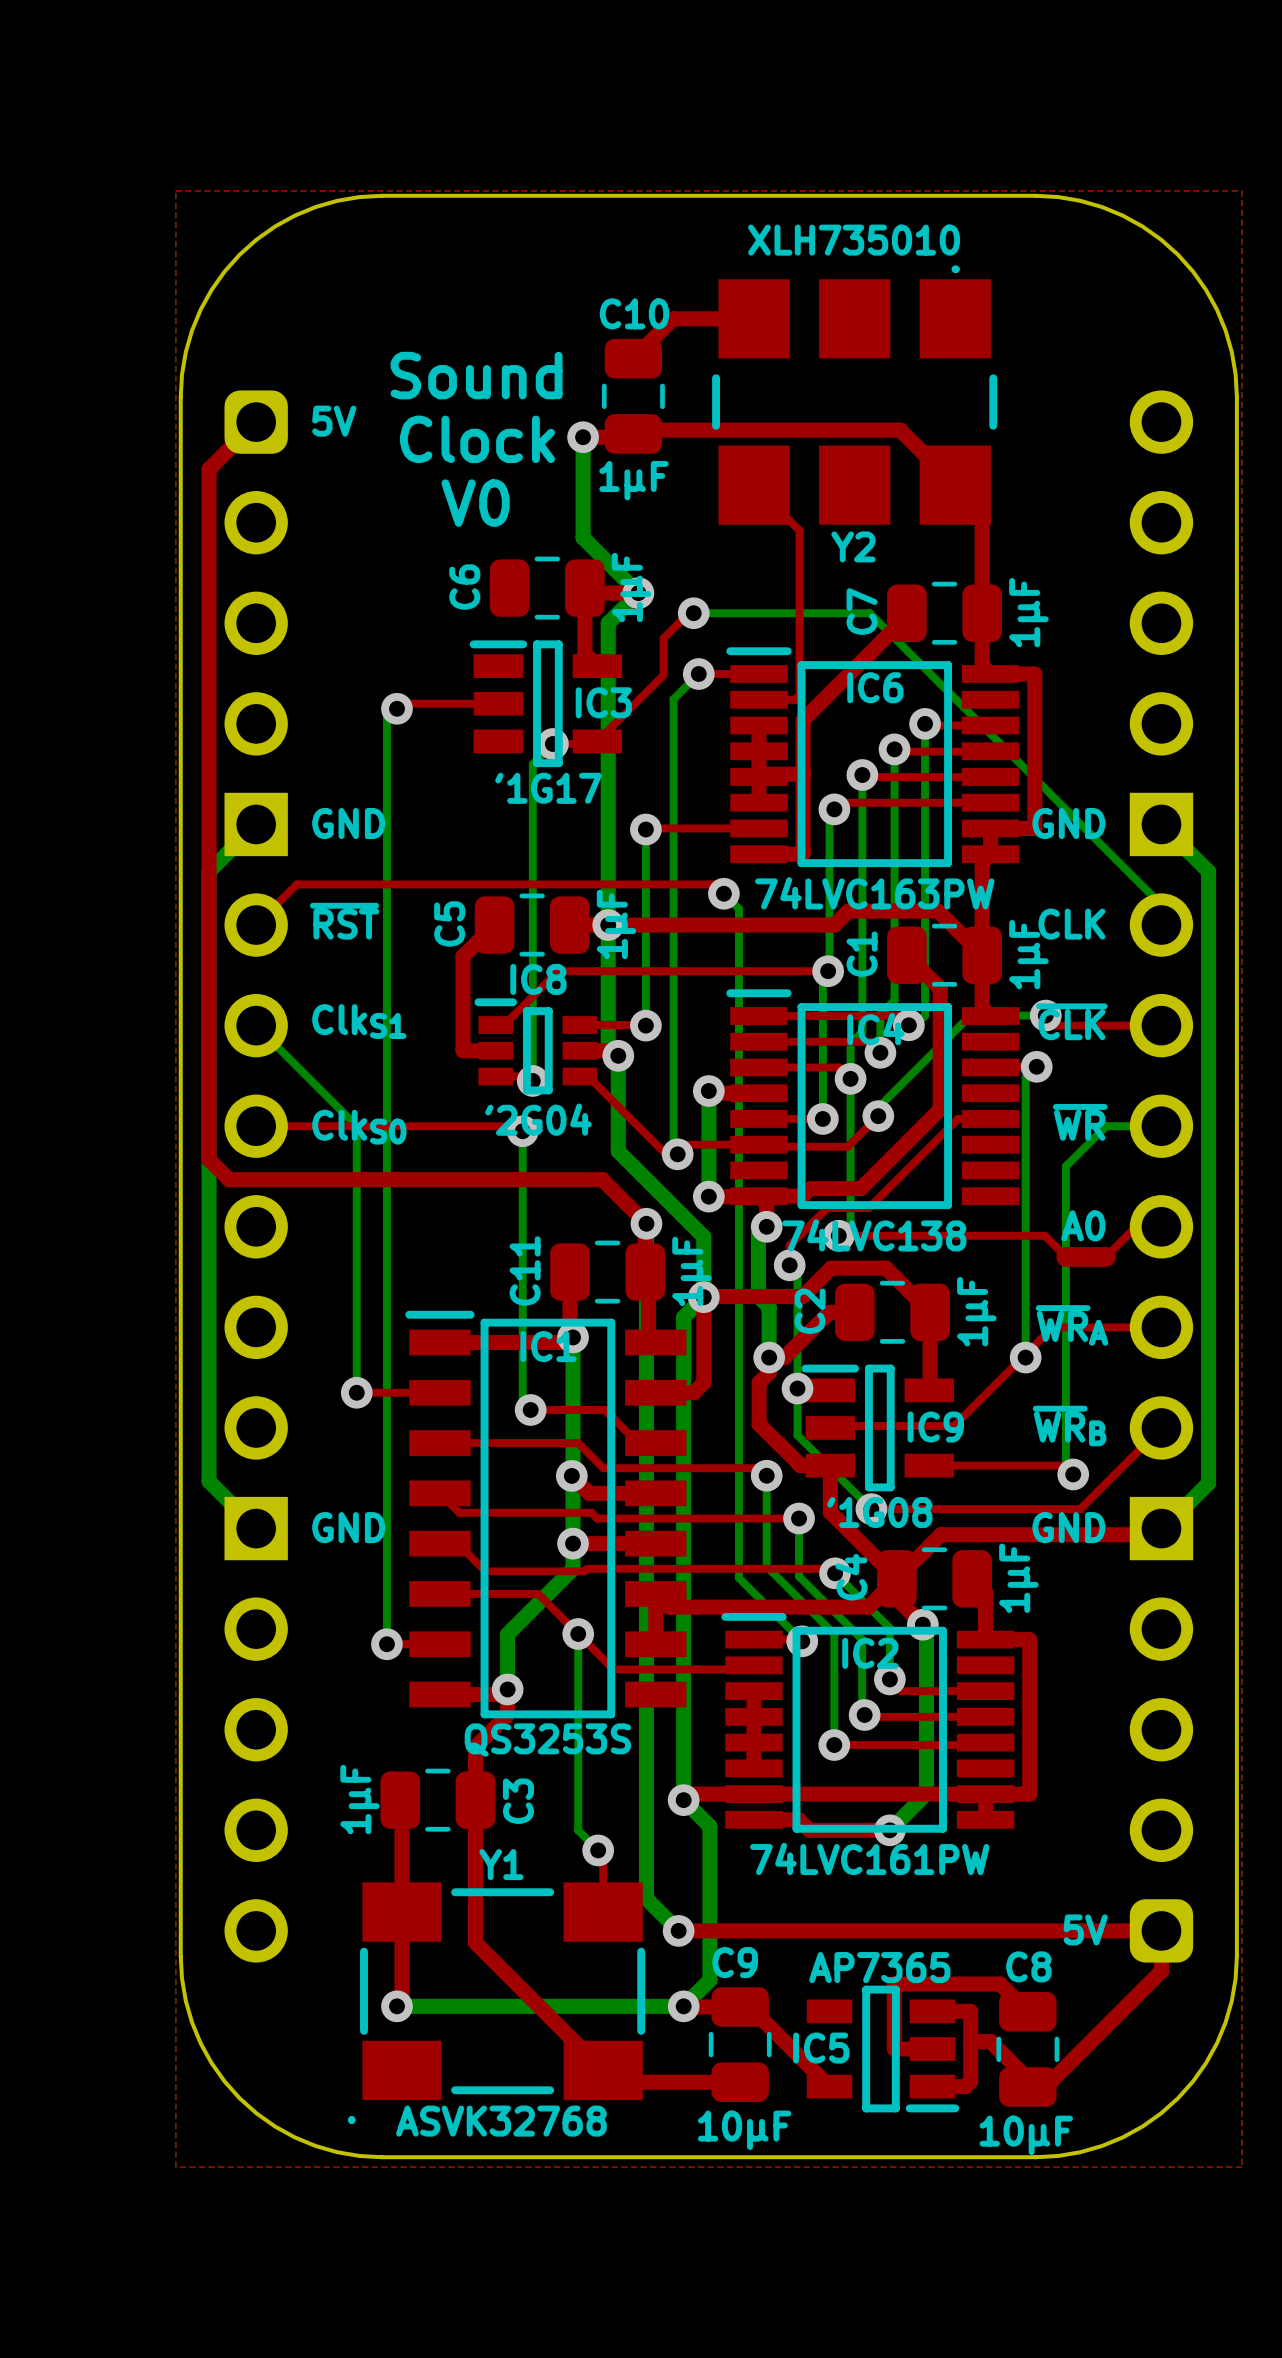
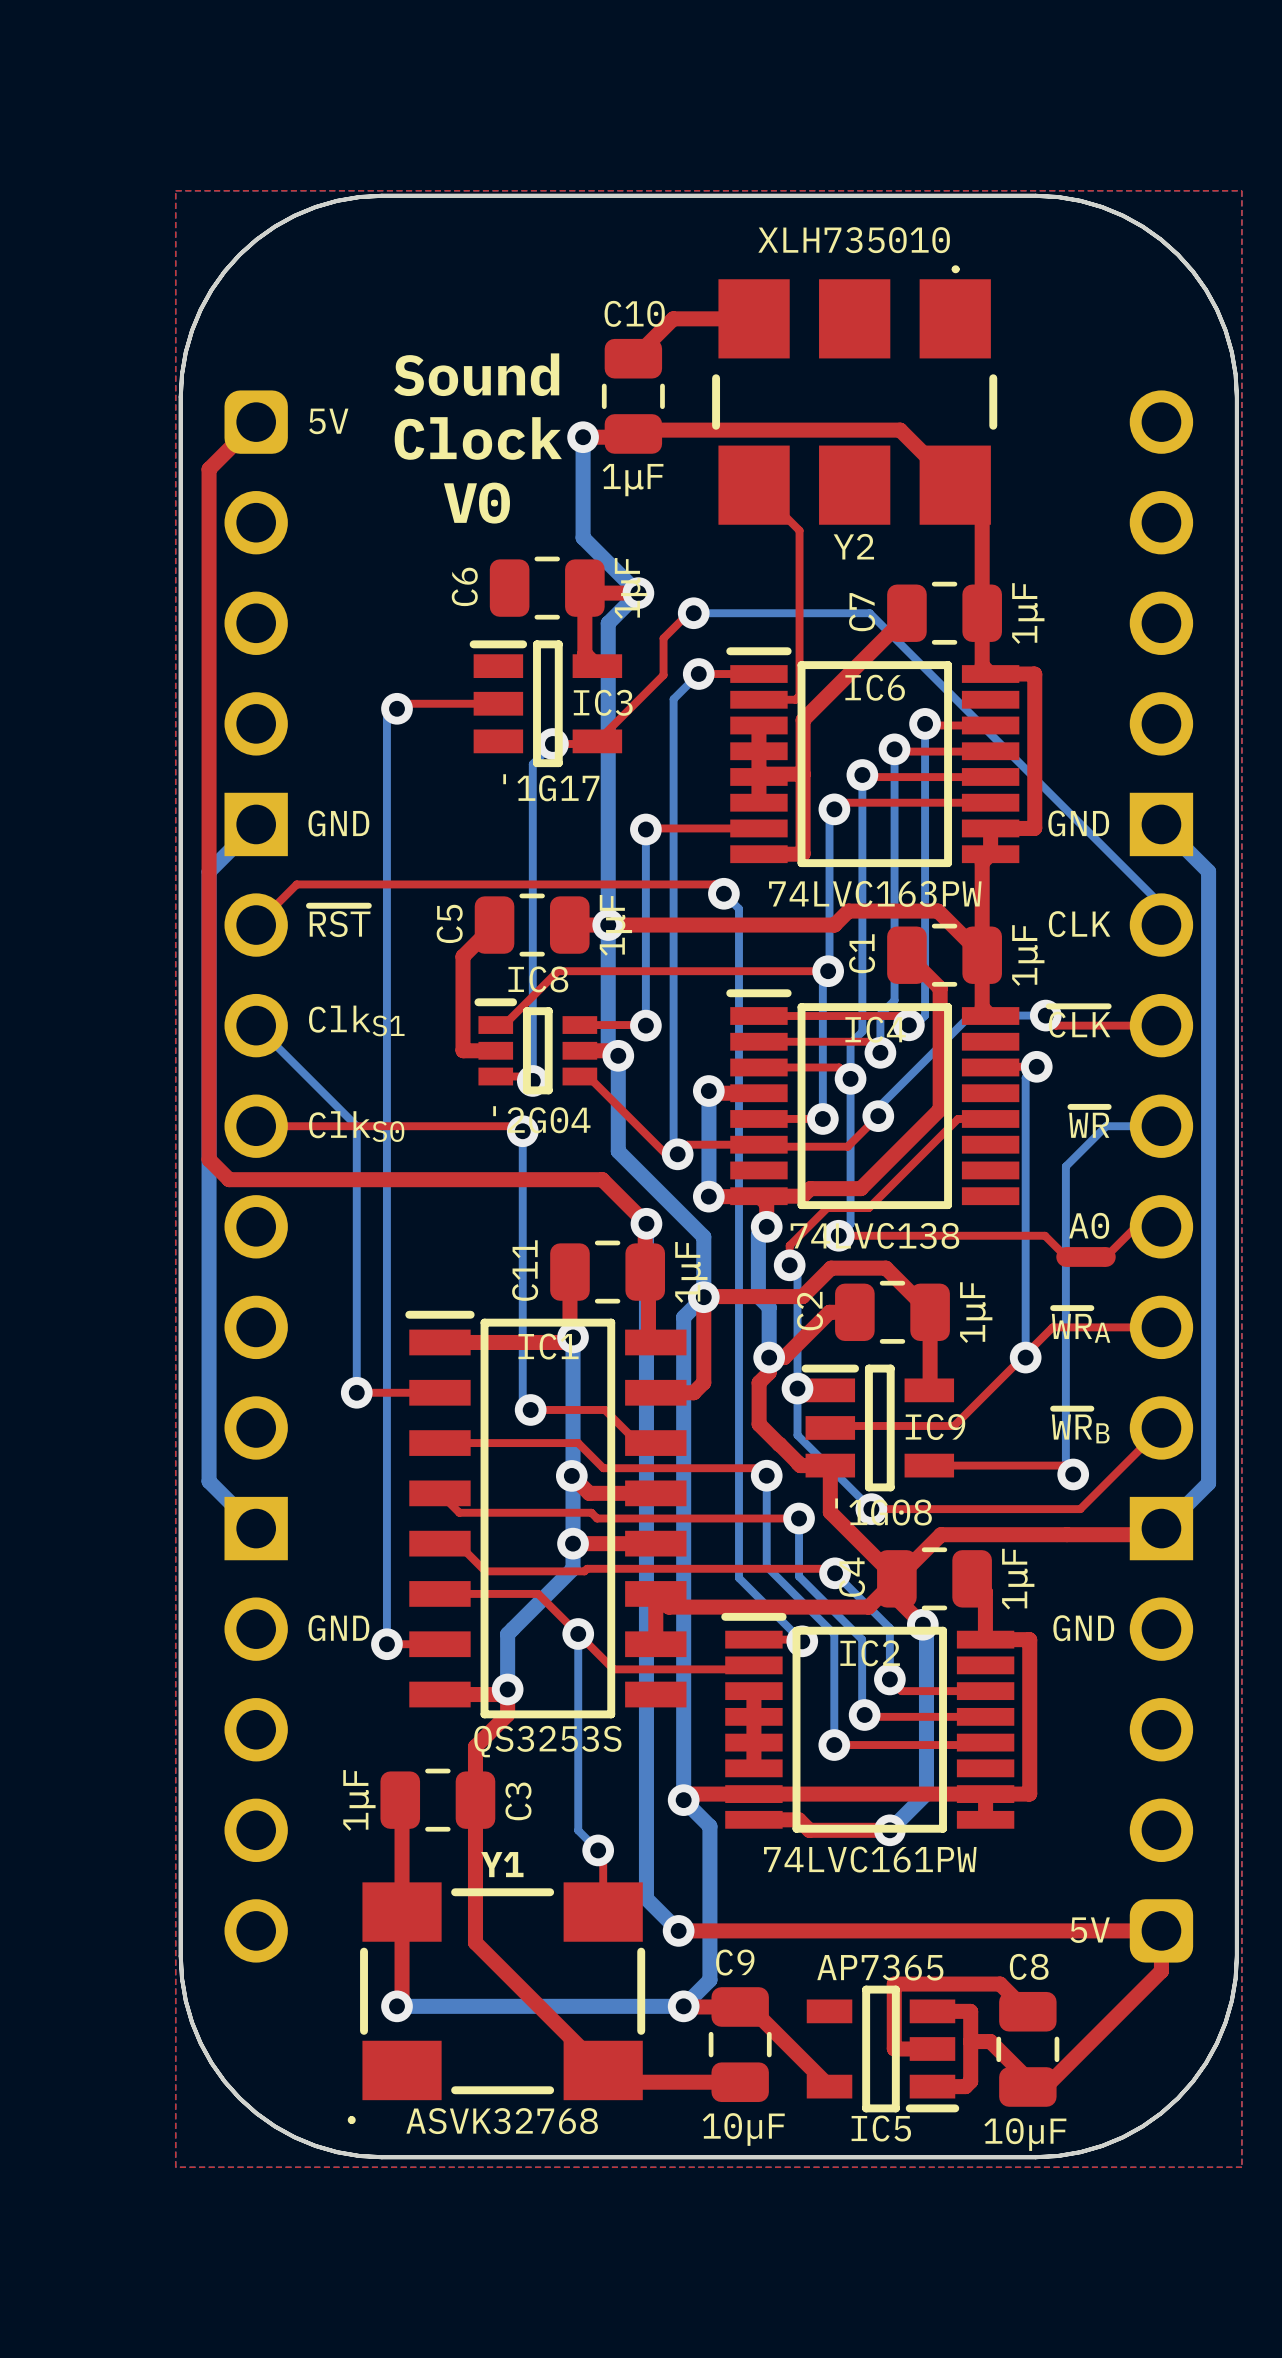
board edge: none -> (381, 195) (1058, 197) (1102, 207) (1123, 215) (1161, 239) (1193, 271) (1206, 289) (1225, 330) (1235, 374) (1236, 396) (1235, 1978) (1225, 2022) (1216, 2043) (1193, 2081) (1161, 2113) (1142, 2126) (1102, 2145) (1058, 2155) (1035, 2157) (359, 2155) (315, 2145) (294, 2137) (256, 2113) (239, 2098) (211, 2063) (192, 2022) (185, 2000) (180, 1956) (182, 374) (185, 352) (200, 309) (224, 271) (239, 254) (274, 226) (315, 207) (359, 197) (381, 195)
text position: GND (348, 1527) -> GND (338, 1628)
text position: GND (1068, 1527) -> GND (1083, 1628)
IC5 name position: IC5 (821, 2048) -> IC5 (881, 2128)

